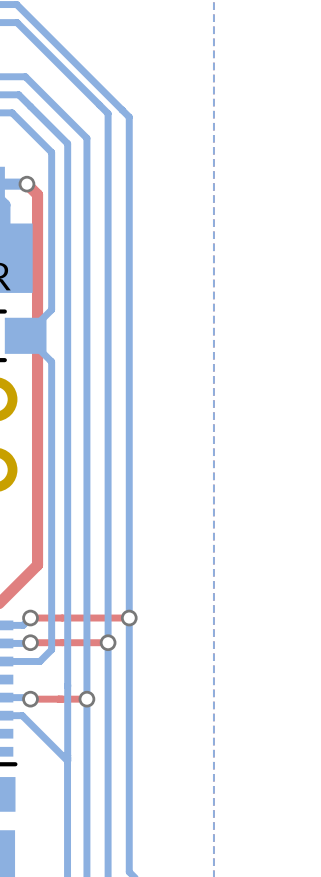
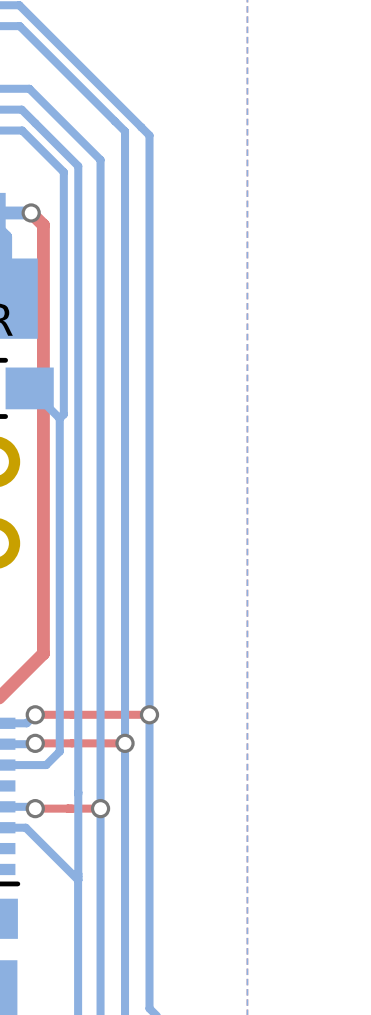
bottom track: (12, 112) (51, 152) (51, 309) (25, 335) -> (14, 130) (22, 130) (63, 172) (63, 414) (59, 418)

